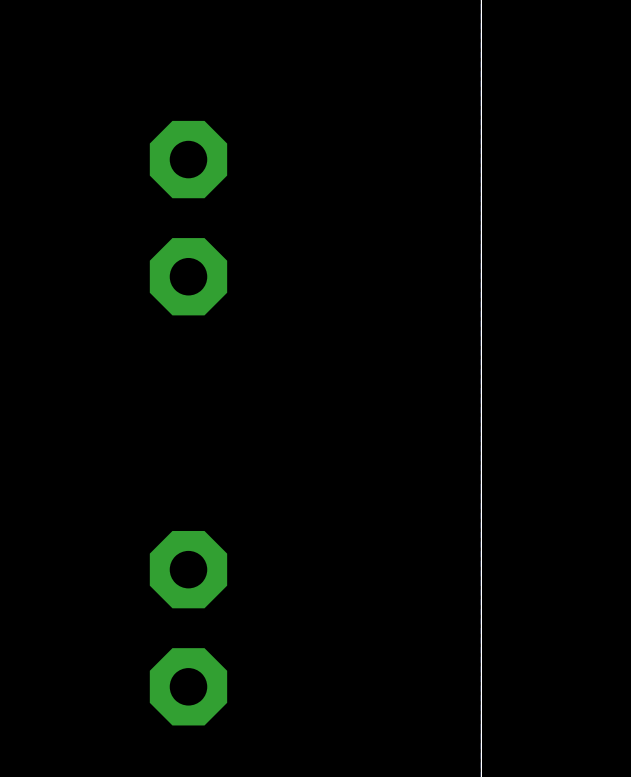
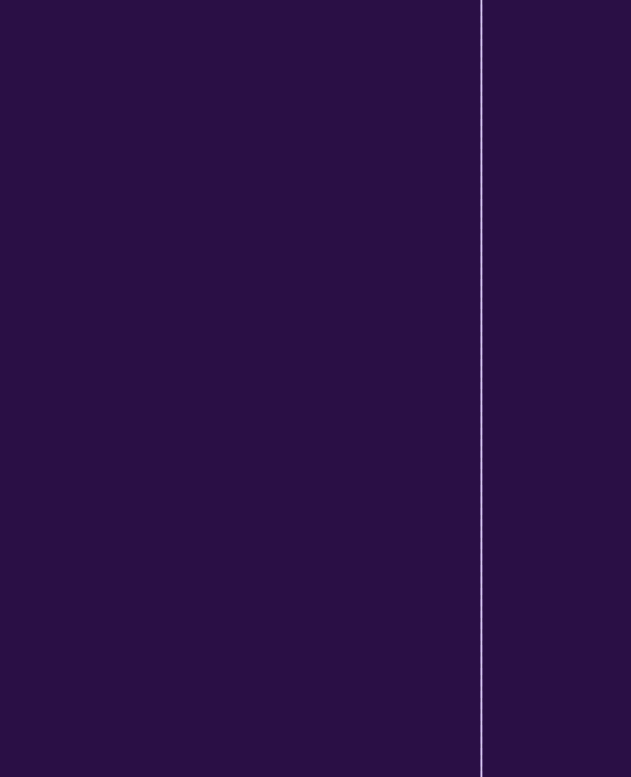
part: (188, 218) -> none
part: (188, 628) -> none

